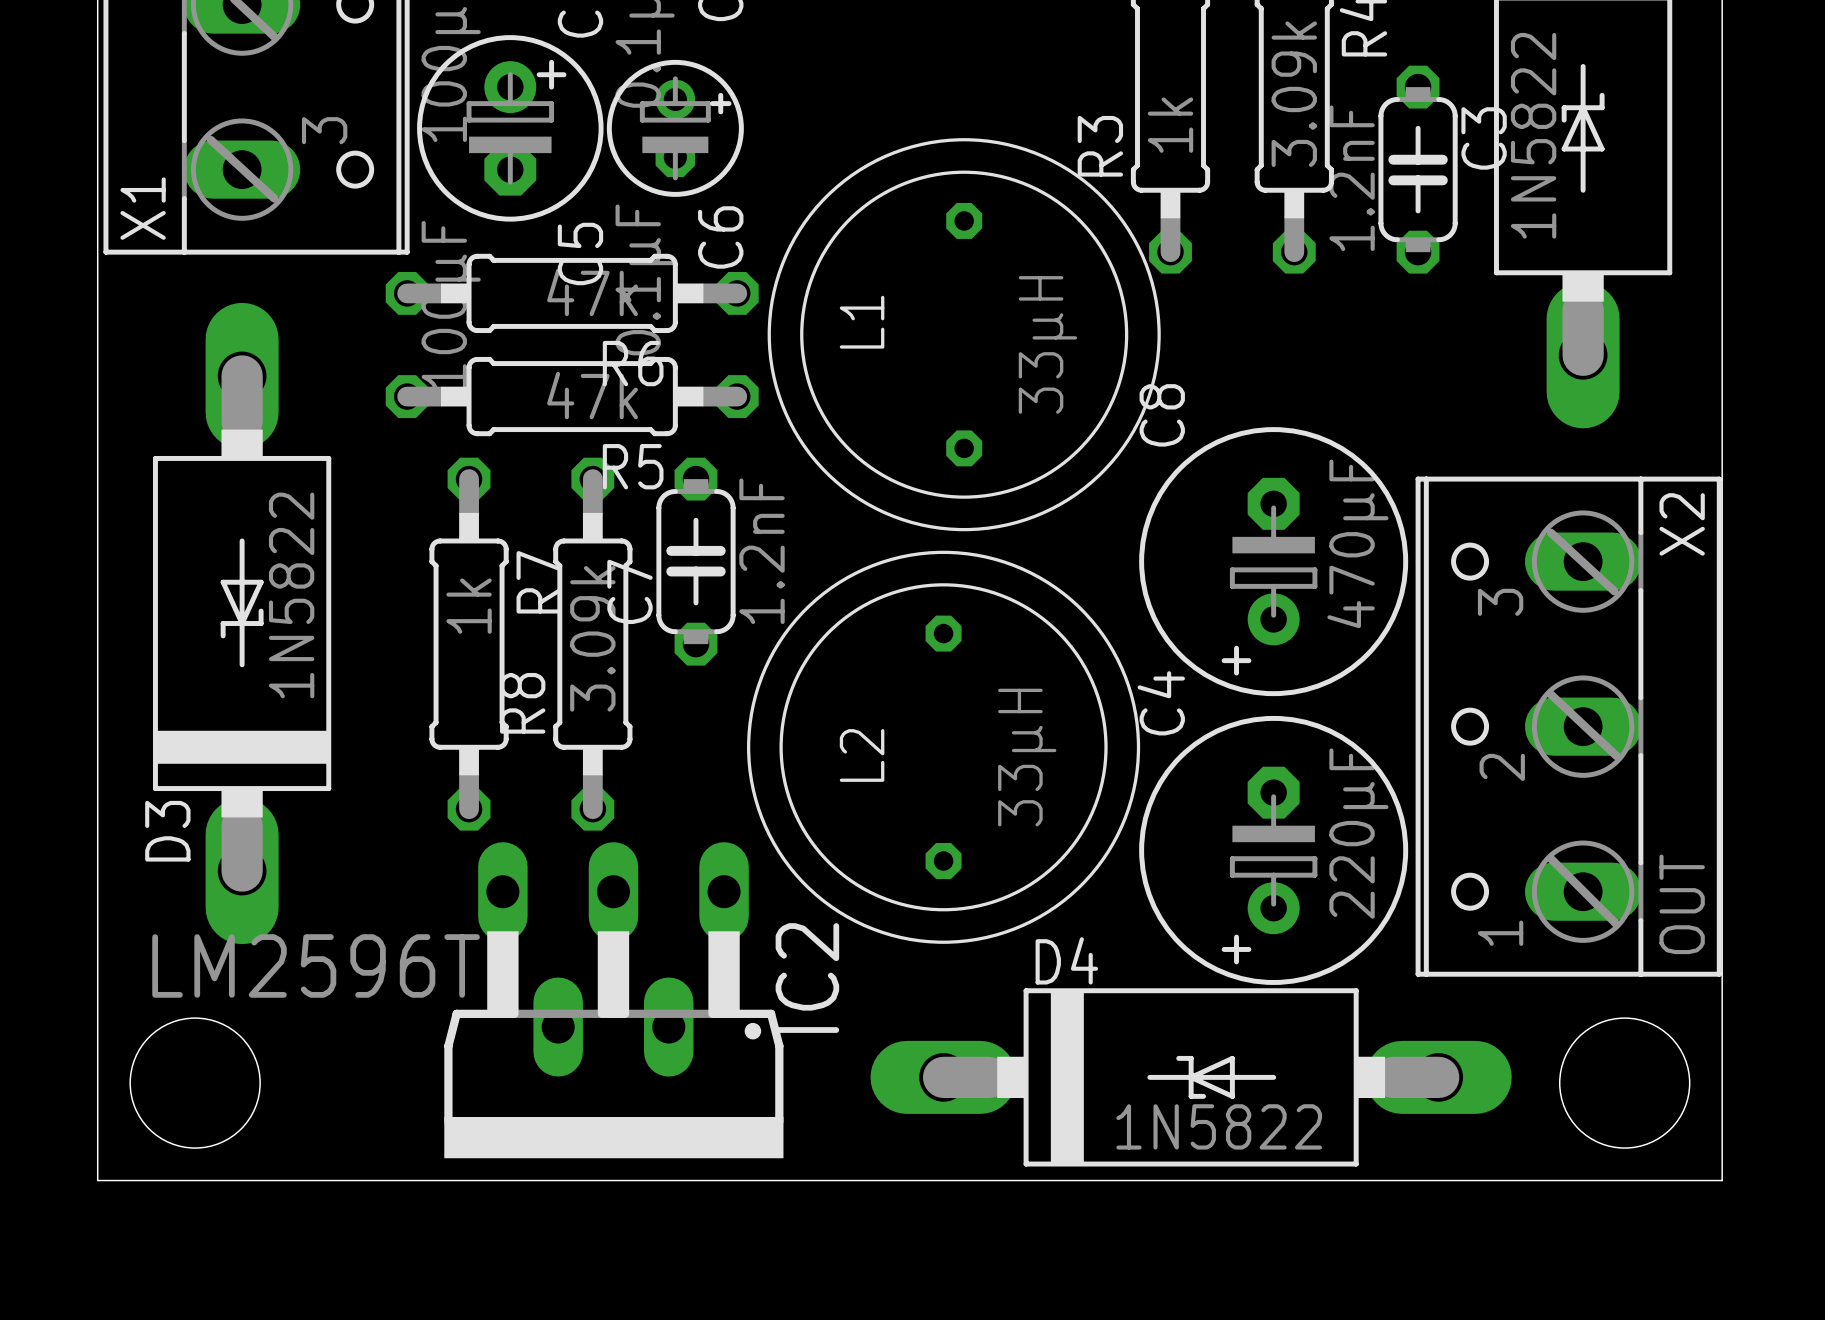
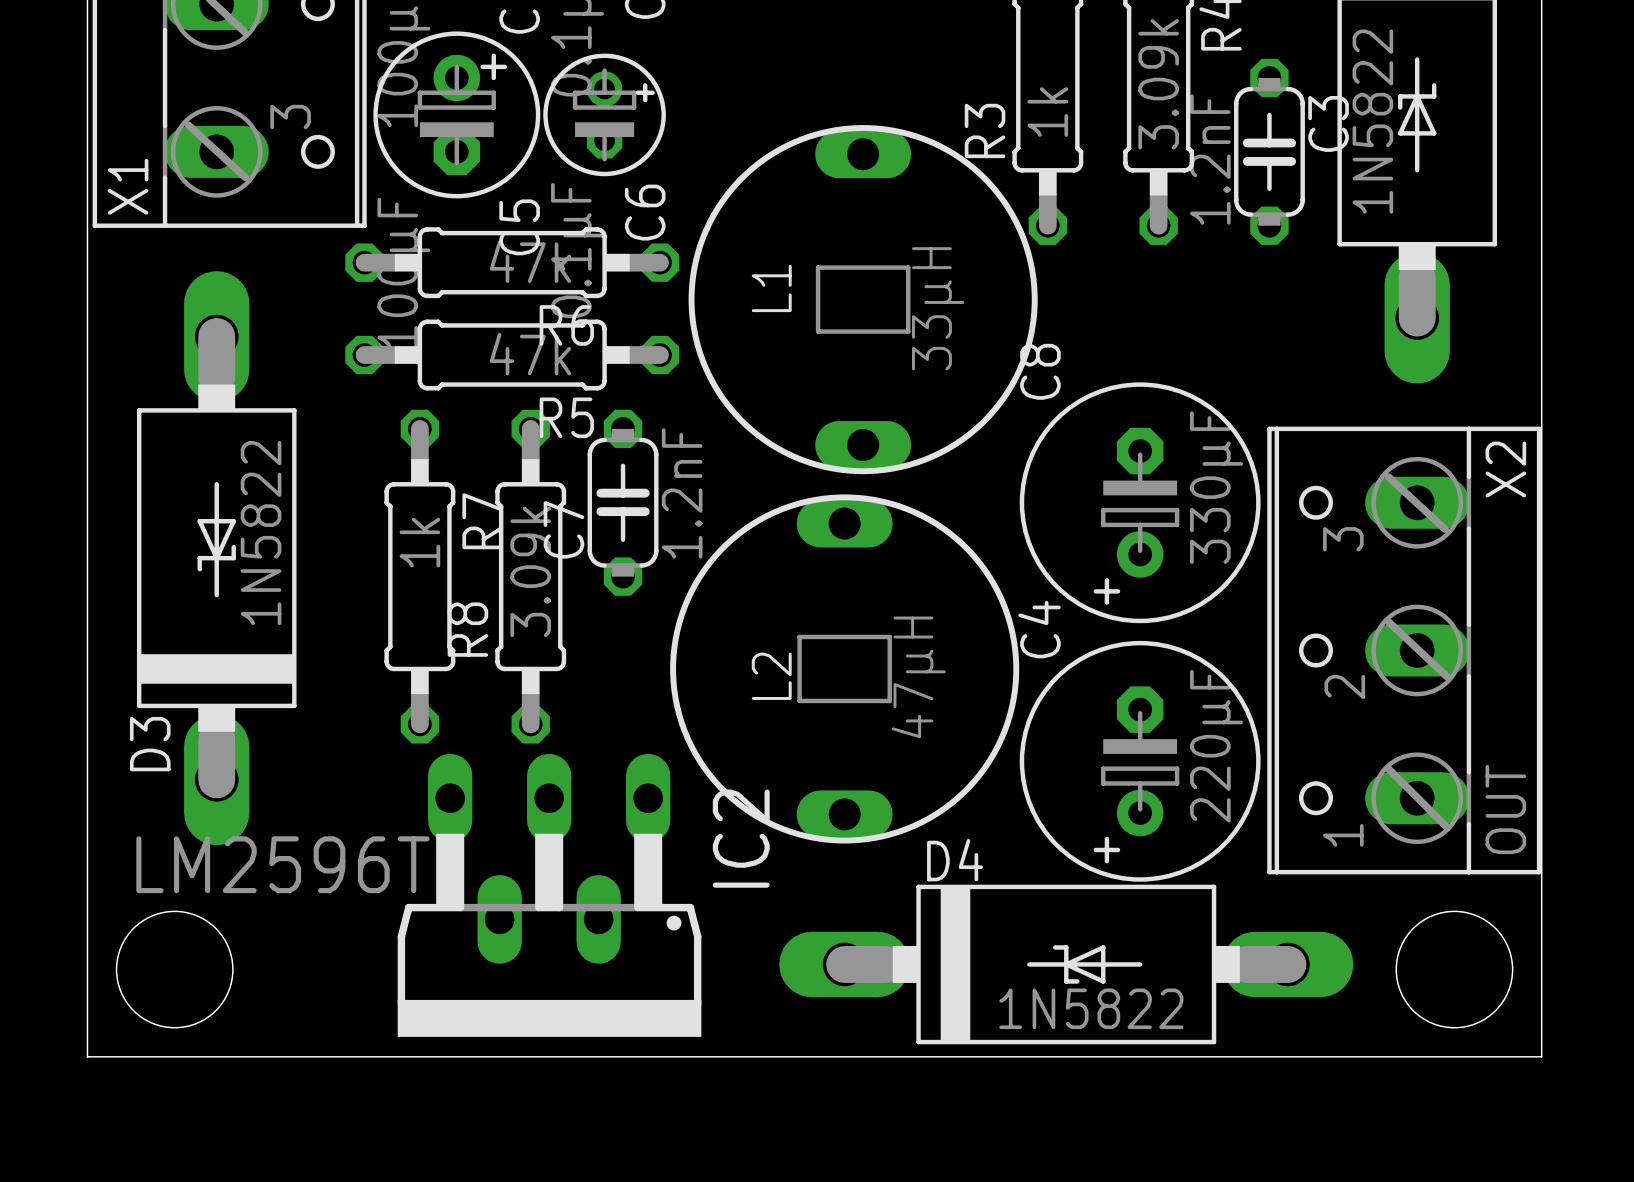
L1 footprint: [767, 138, 1161, 532] -> [688, 125, 1038, 475]
C8 value: 470µF (1357, 543) -> 330µF (1216, 487)
L2 footprint: [747, 550, 1141, 944] -> [670, 494, 1020, 844]
L2 value: 33µH (1027, 757) -> 47µH (918, 677)
IC2 name position: IC2 (807, 978) -> IC2 (741, 838)

